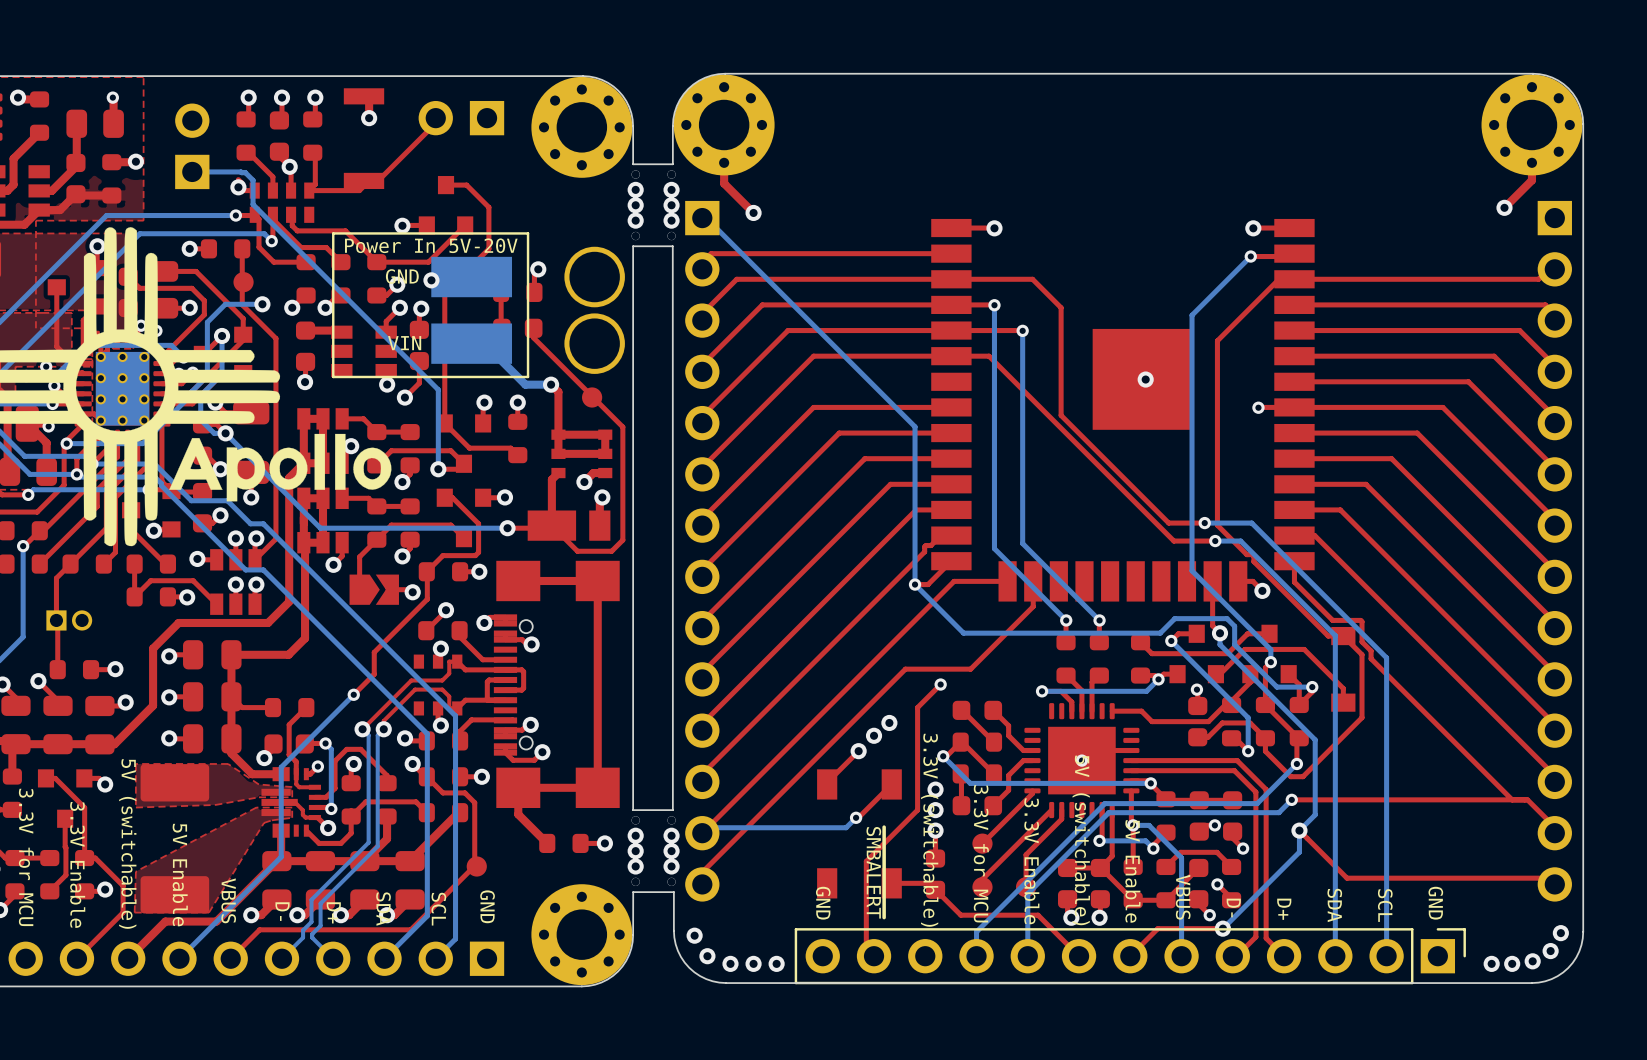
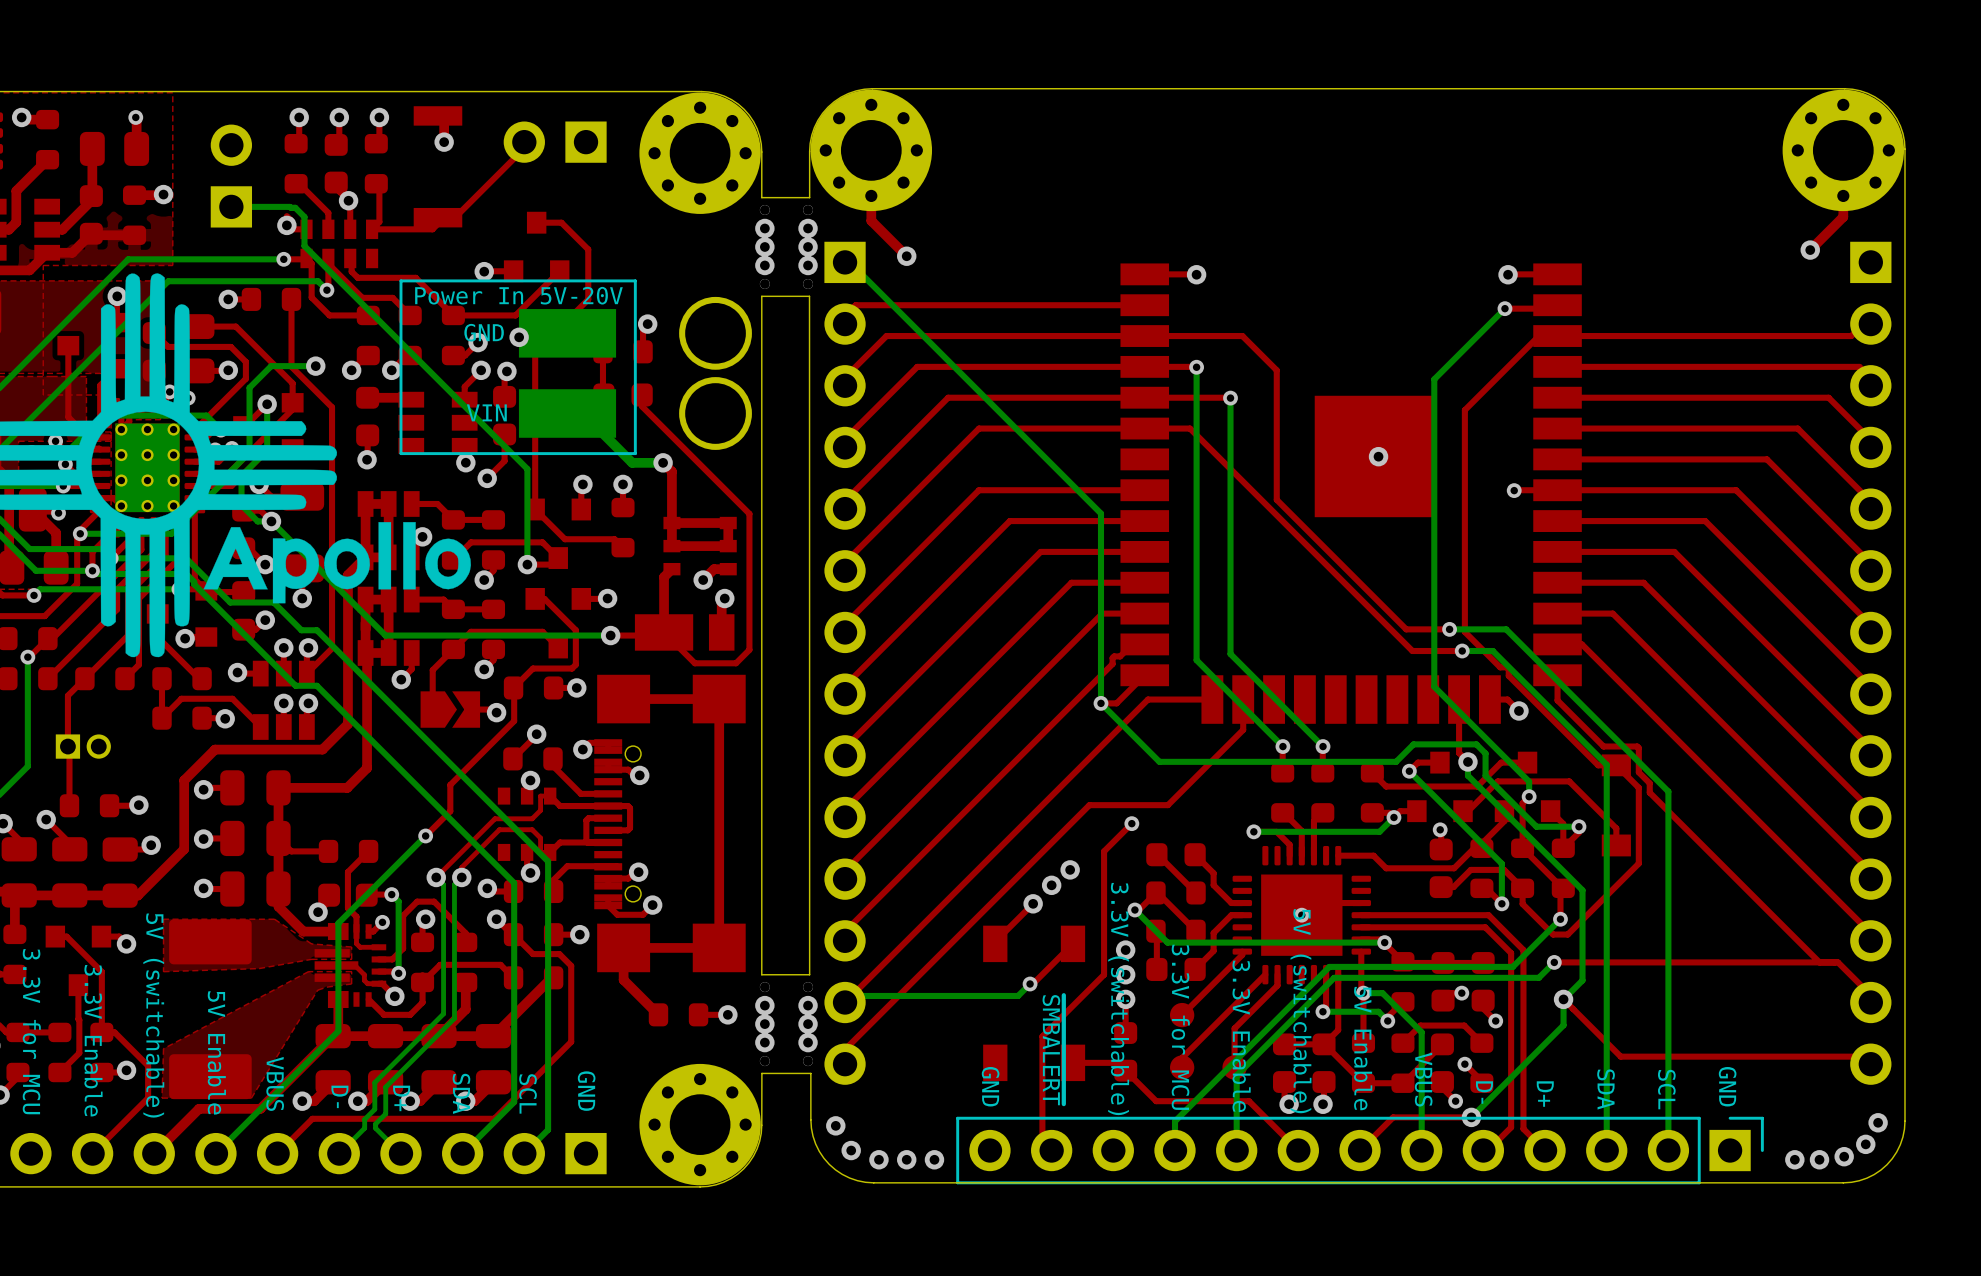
part: (243, 282) -> none
part: (592, 397) -> none
part: (476, 866) -> none

